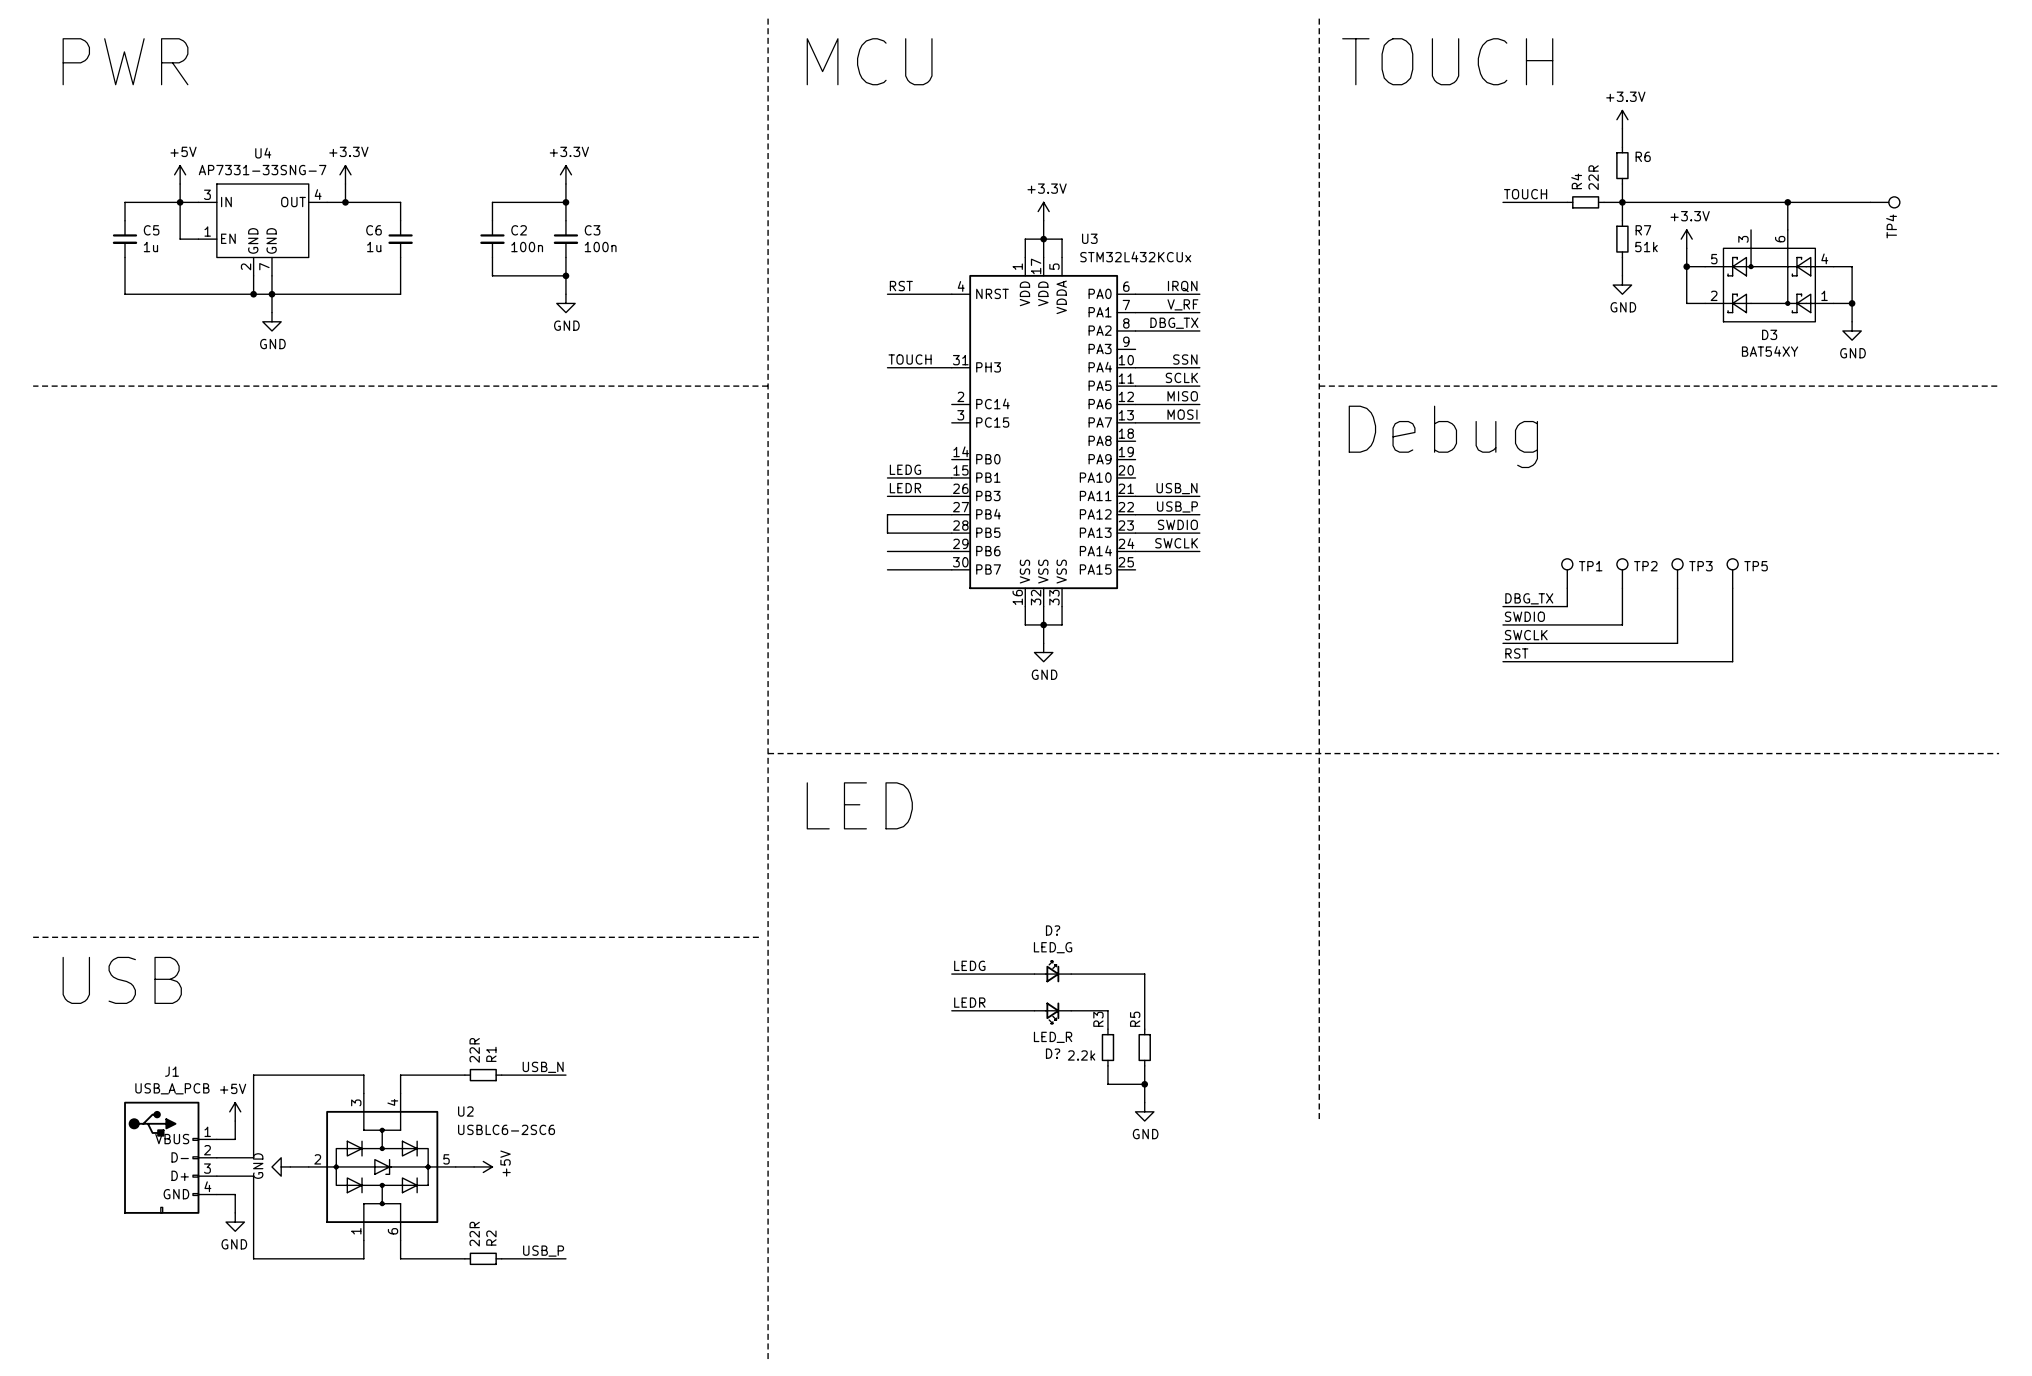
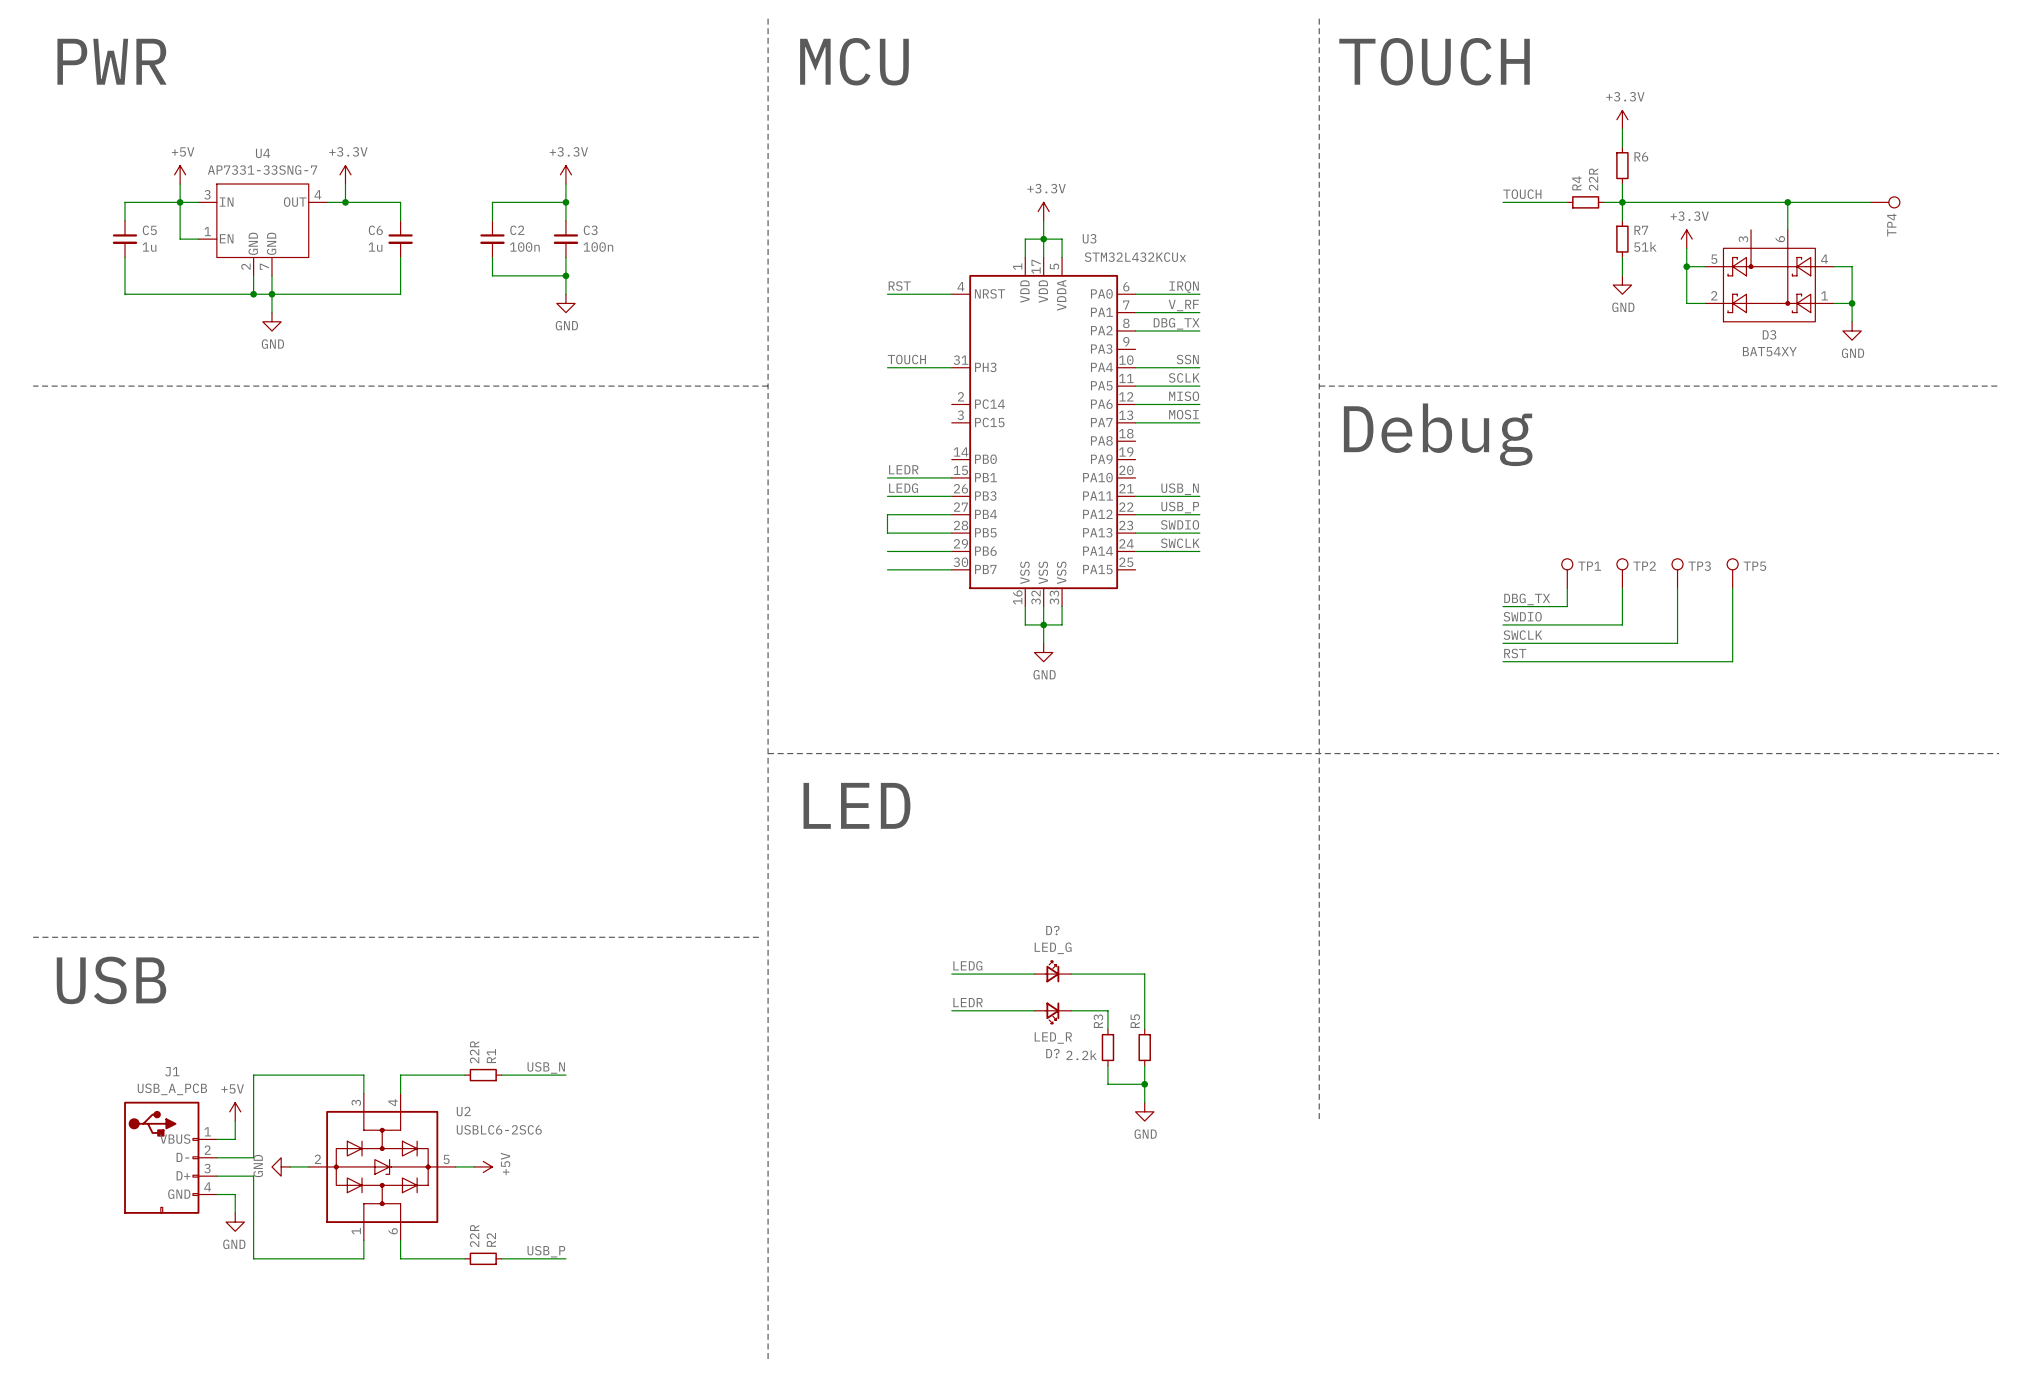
label: LEDG (905, 469) -> LEDR (903, 469)
label: LEDR (905, 488) -> LEDG (903, 488)

